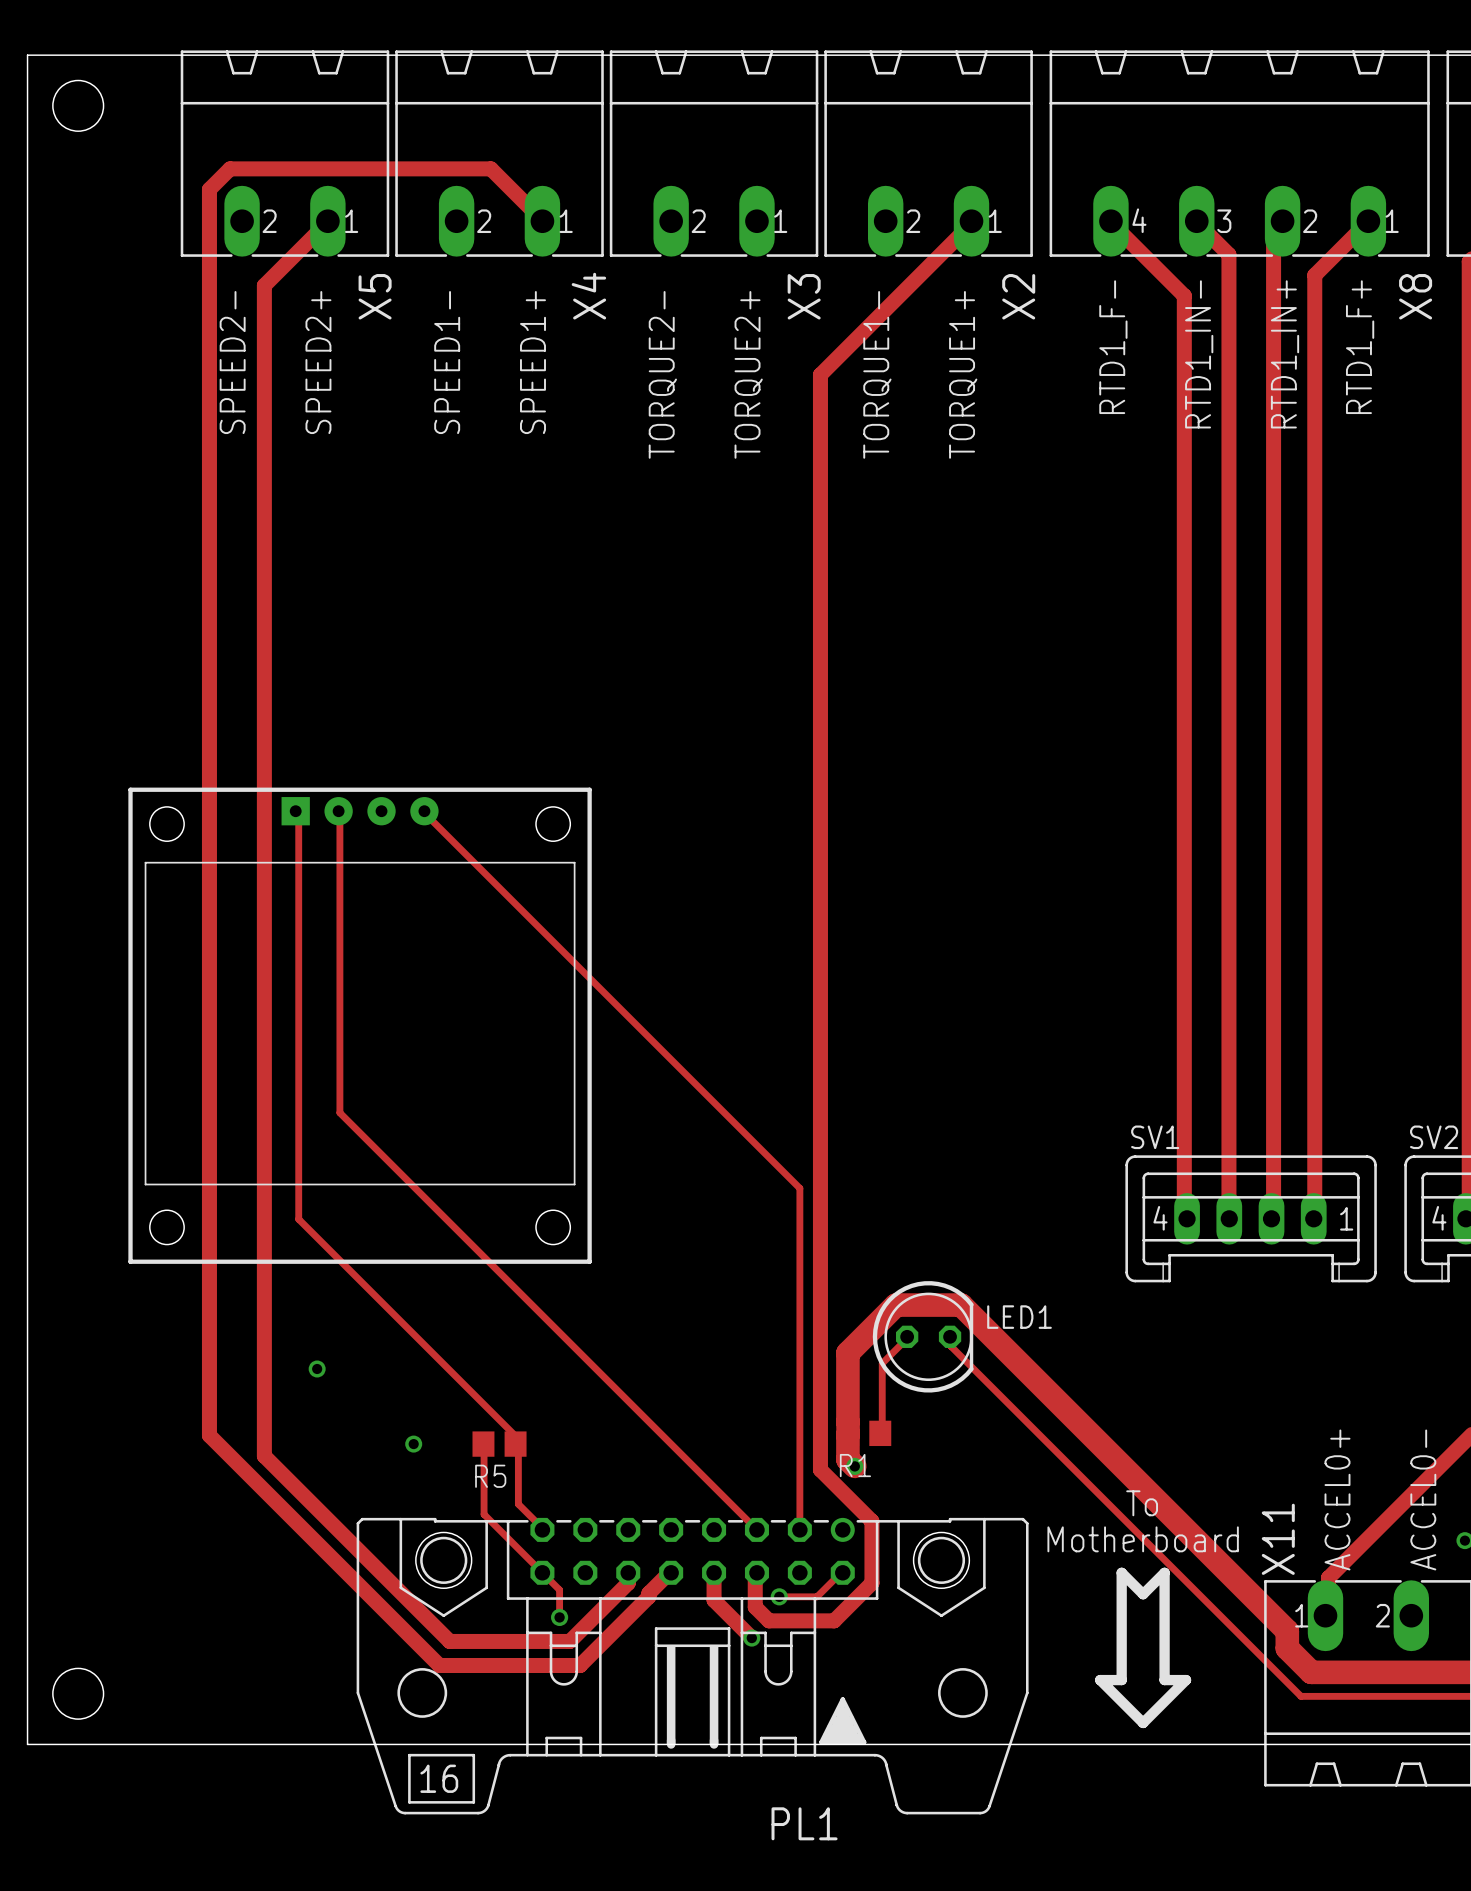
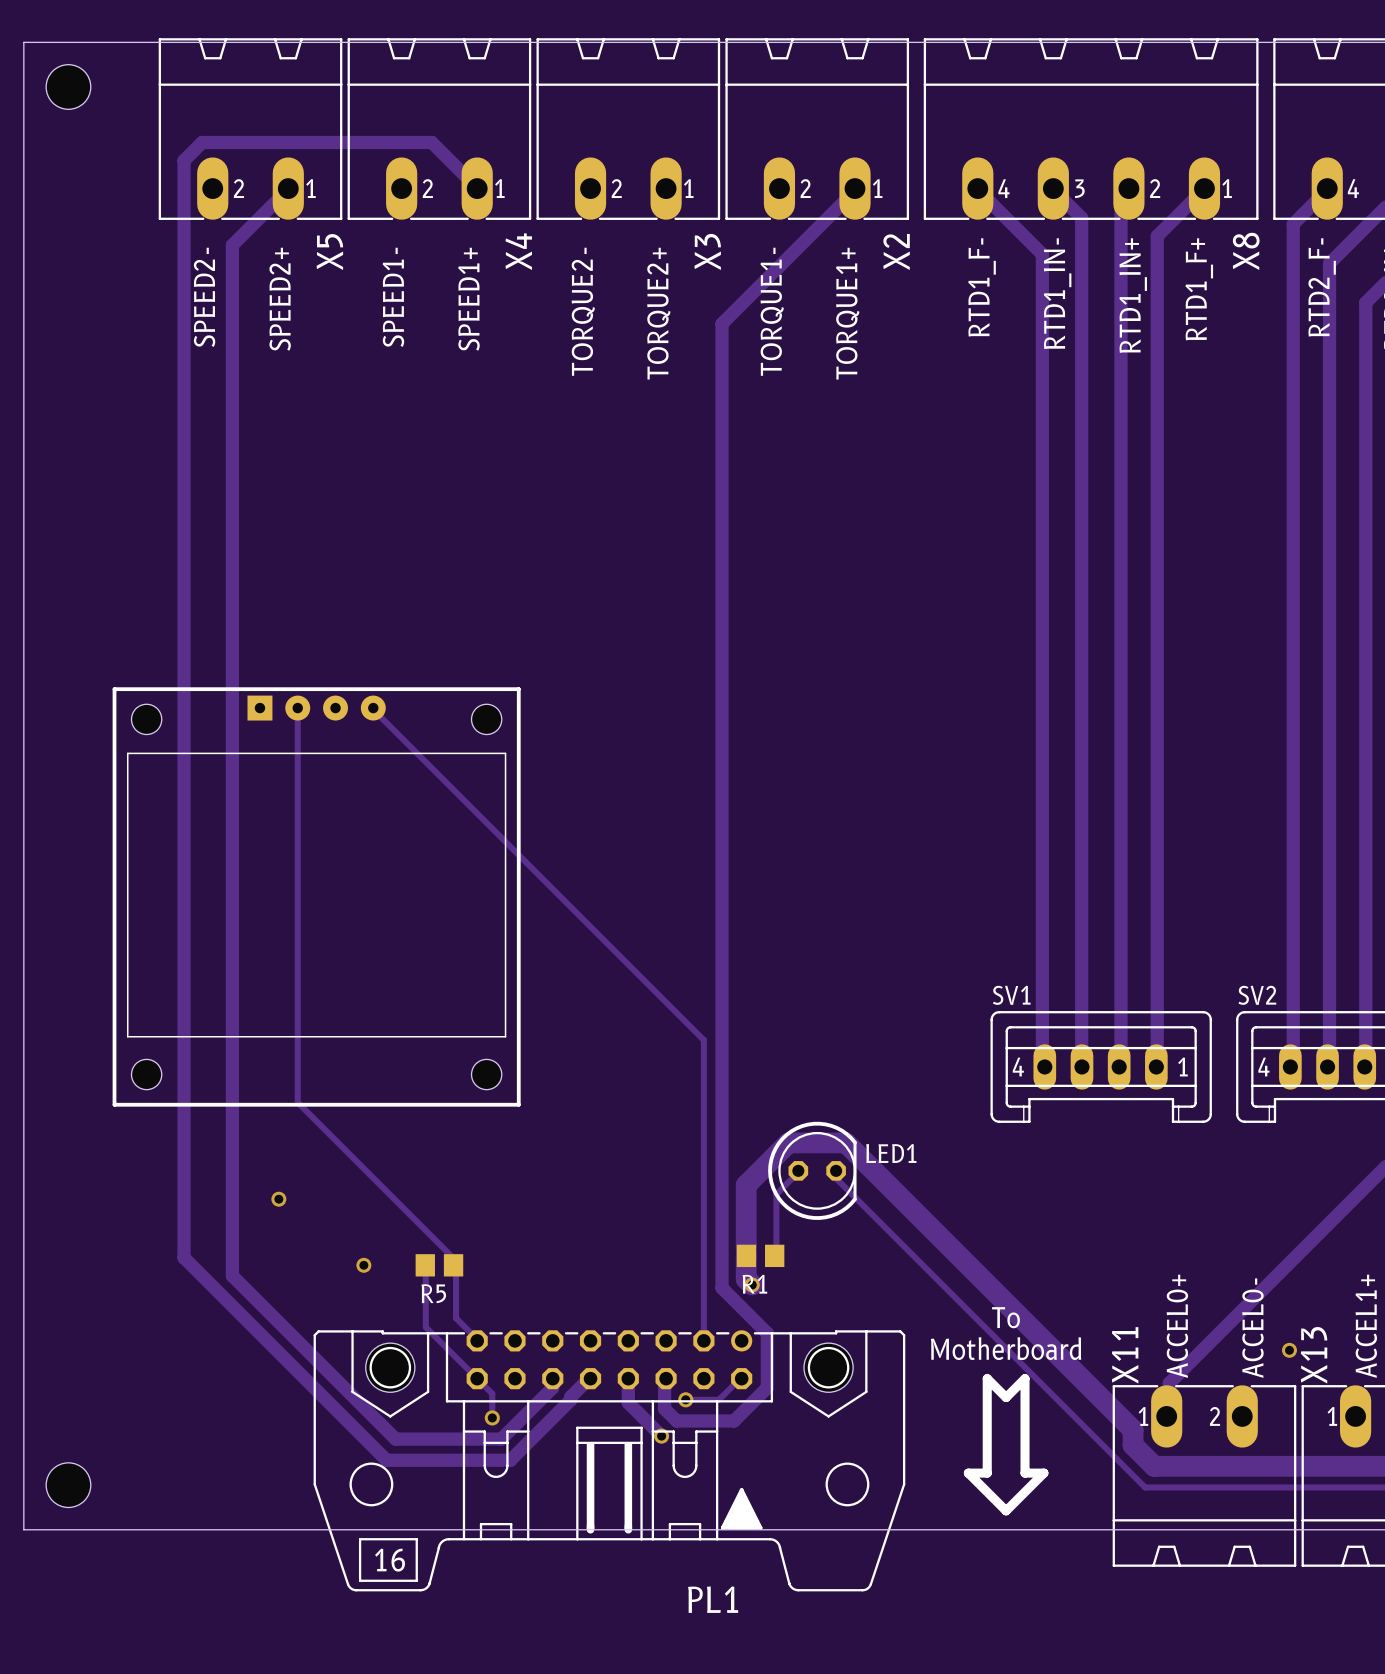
track: (295, 811) (298, 814) (298, 1219) (338, 1259) -> (297, 708) (297, 1102)
track: (338, 811) (339, 1112) (756, 1529) -> none

